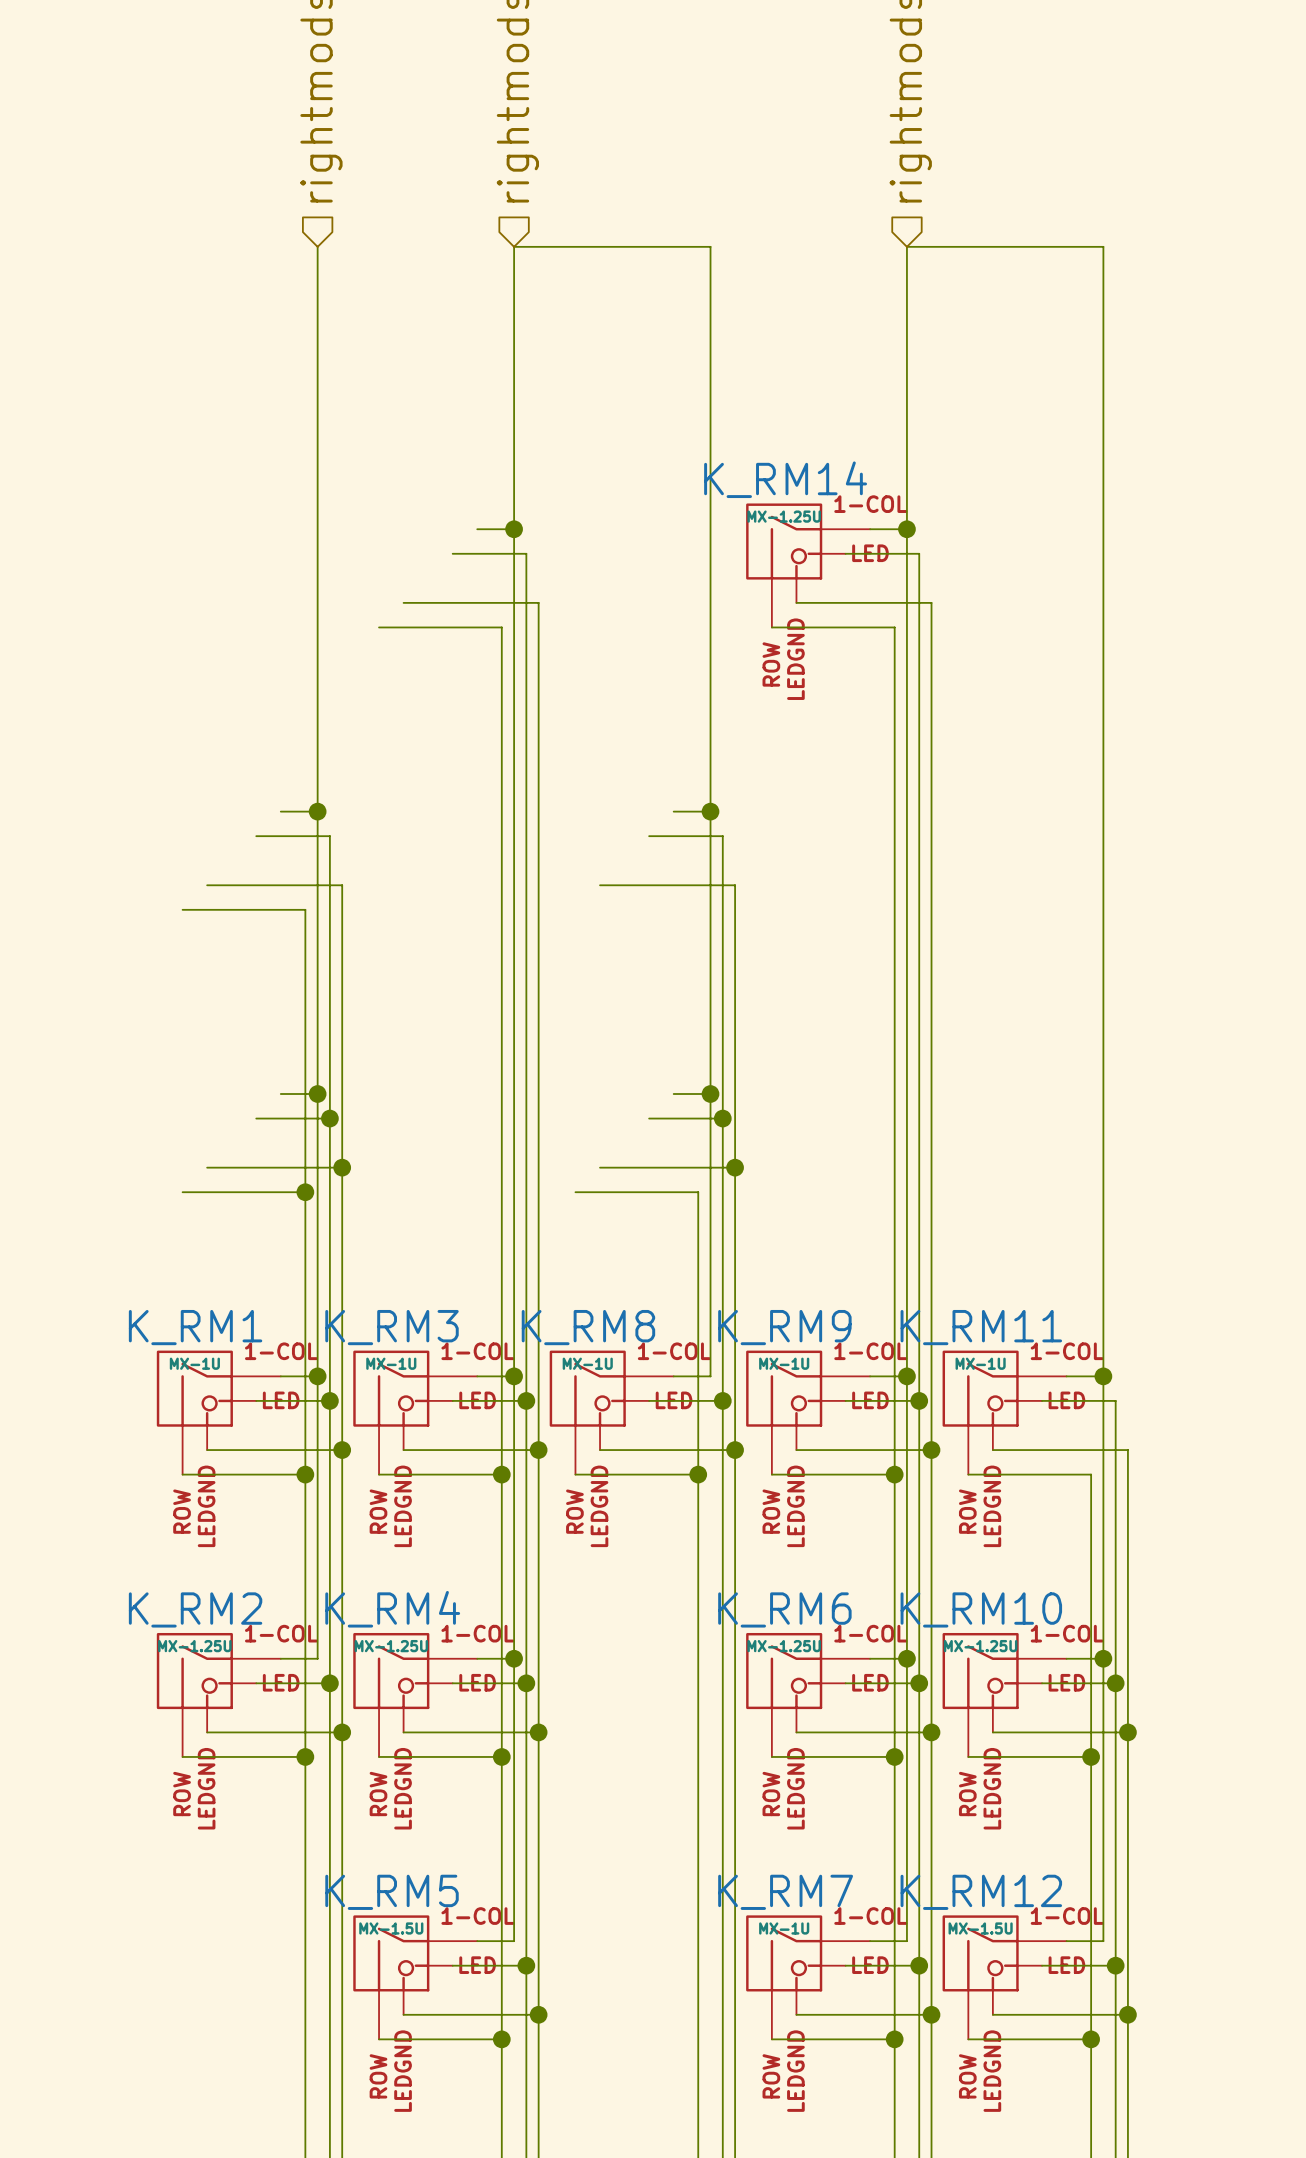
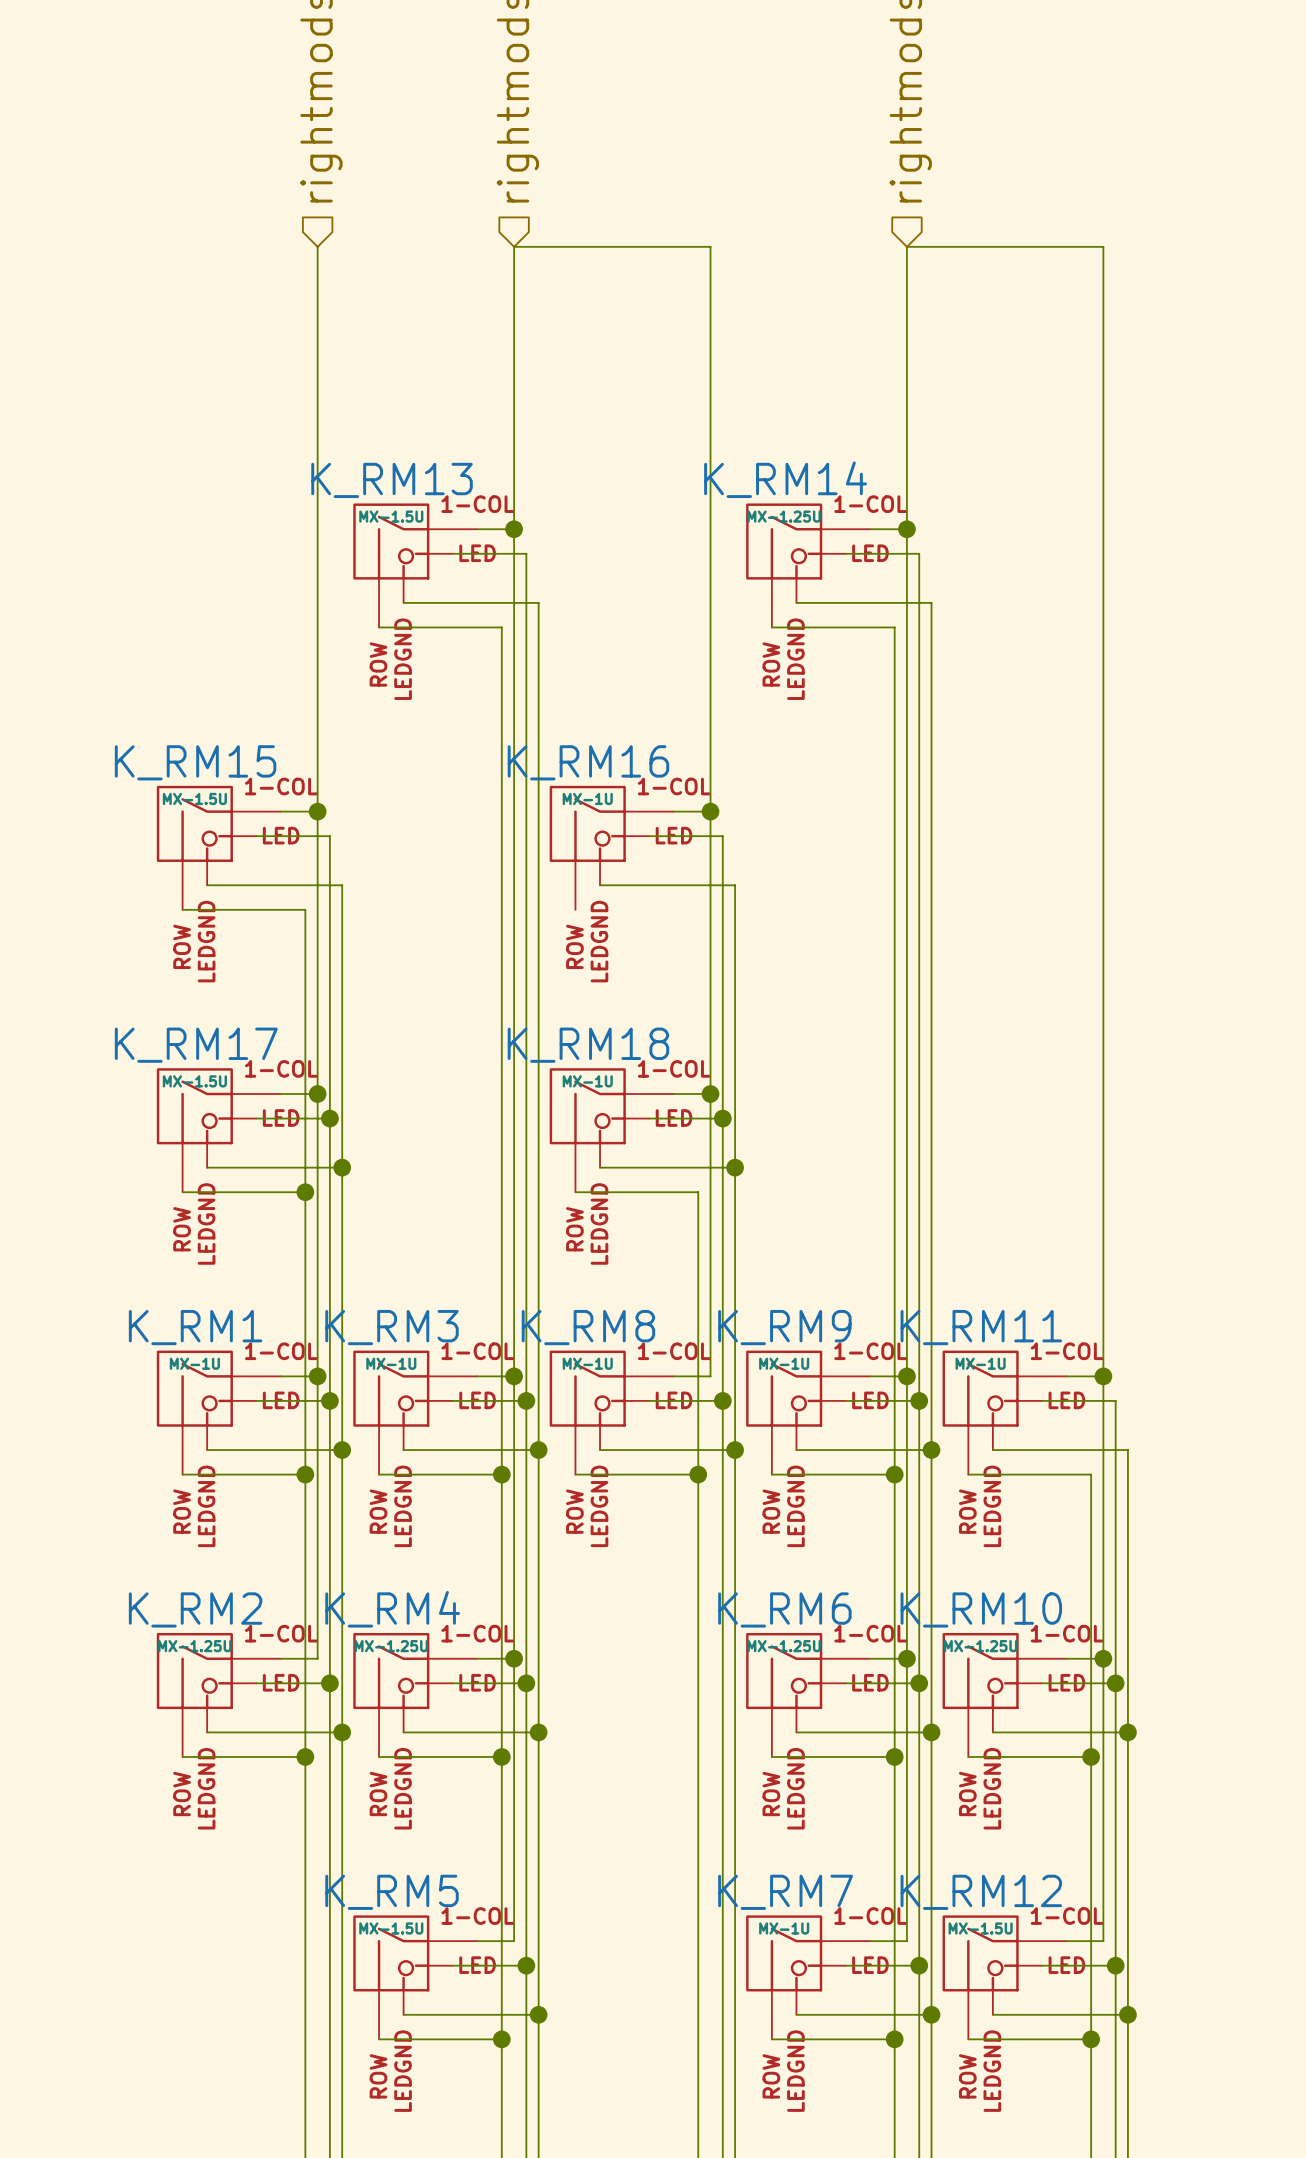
K_RM13: none -> MX-1.5U (415, 565)
K_RM15: none -> MX-1.5U (218, 847)
K_RM16: none -> MX-1U (611, 847)
K_RM17: none -> MX-1.5U (218, 1130)
K_RM18: none -> MX-1U (611, 1130)

